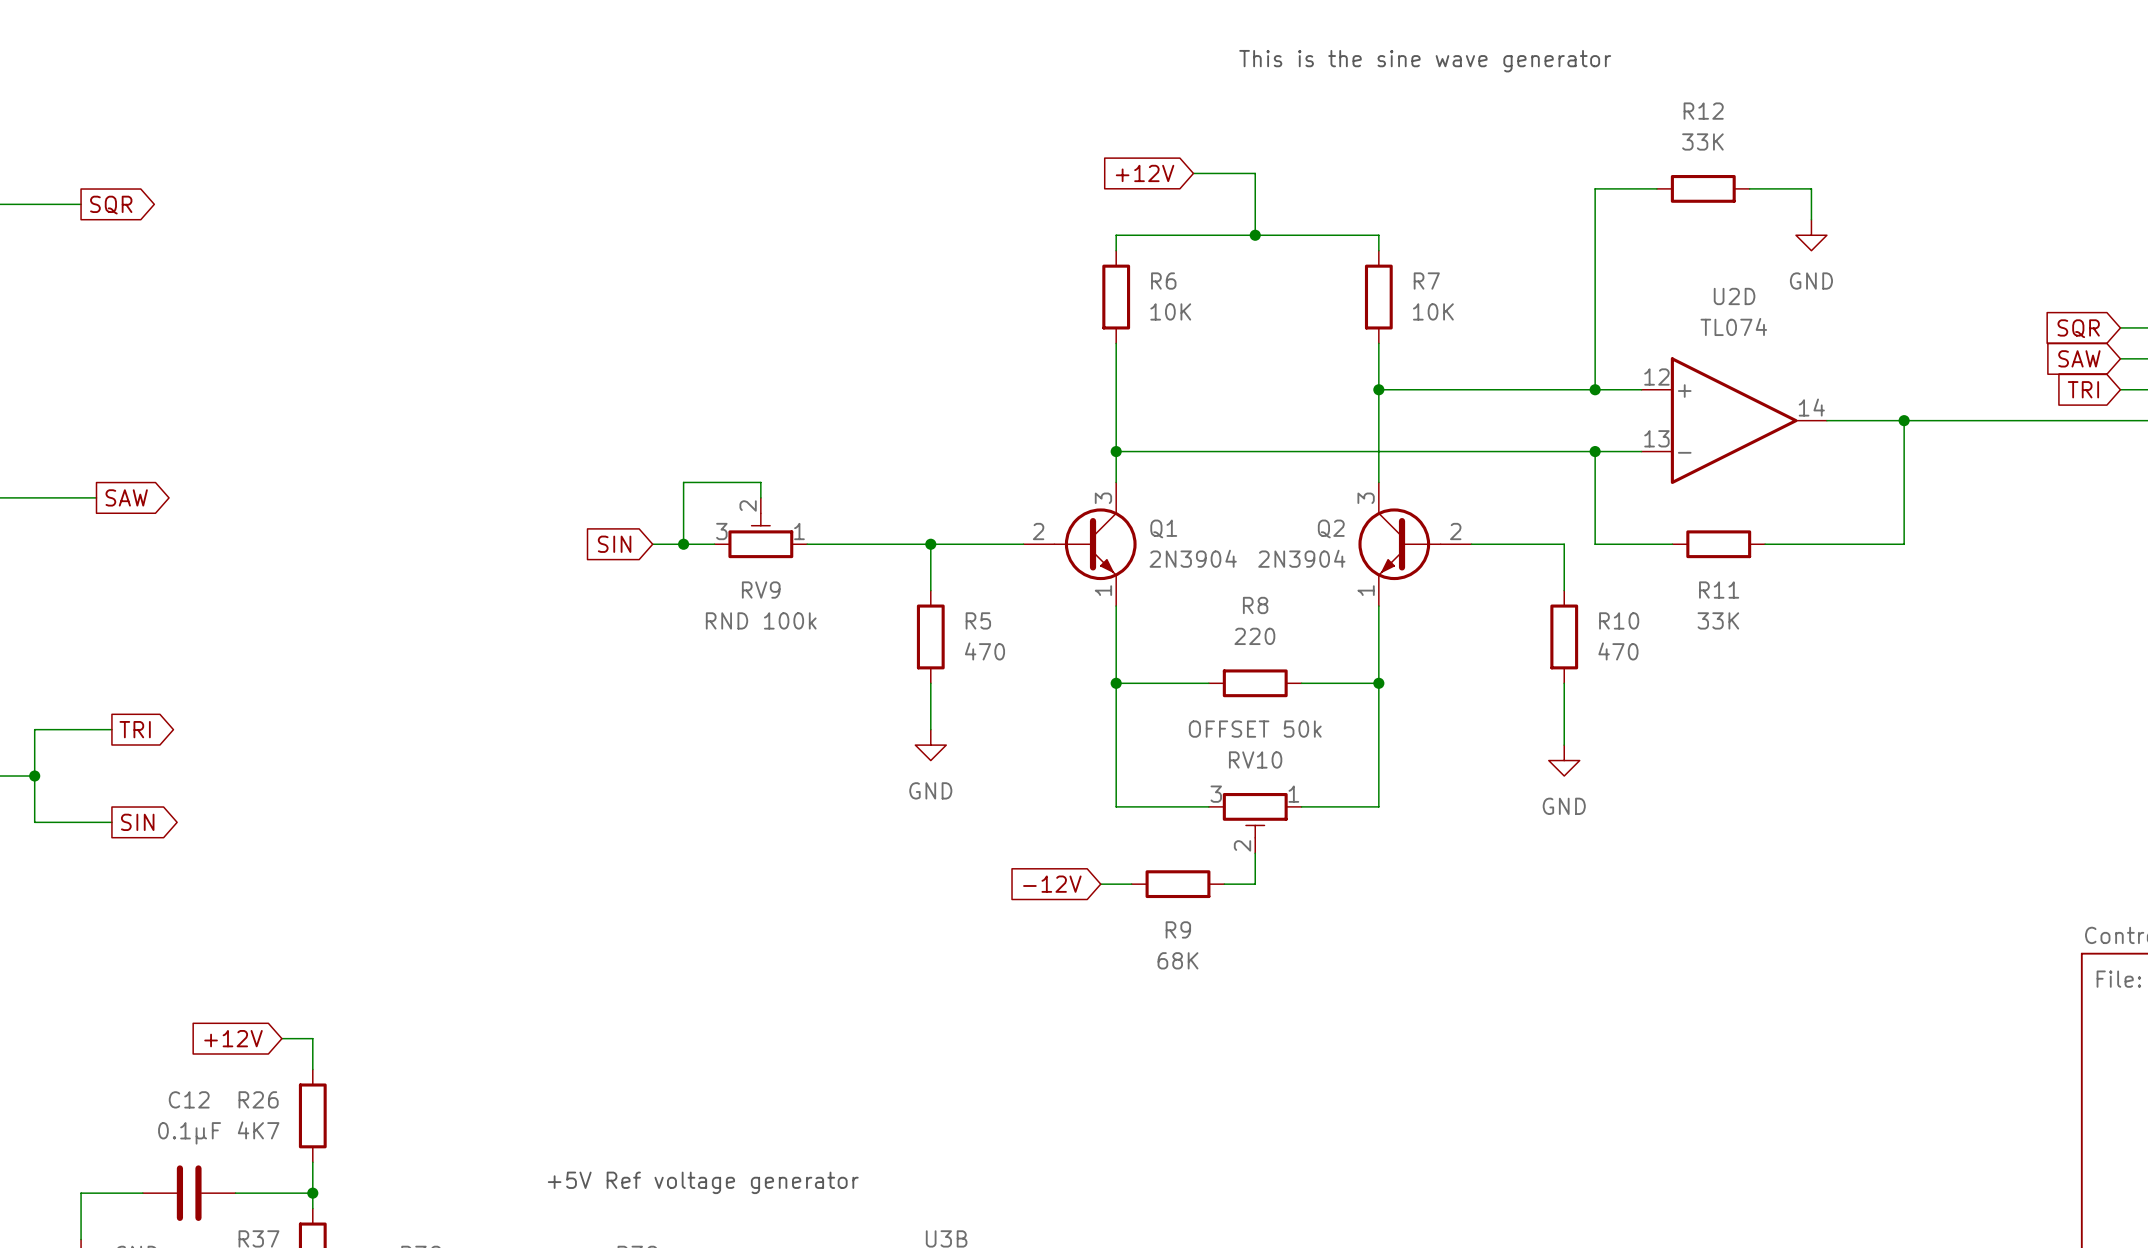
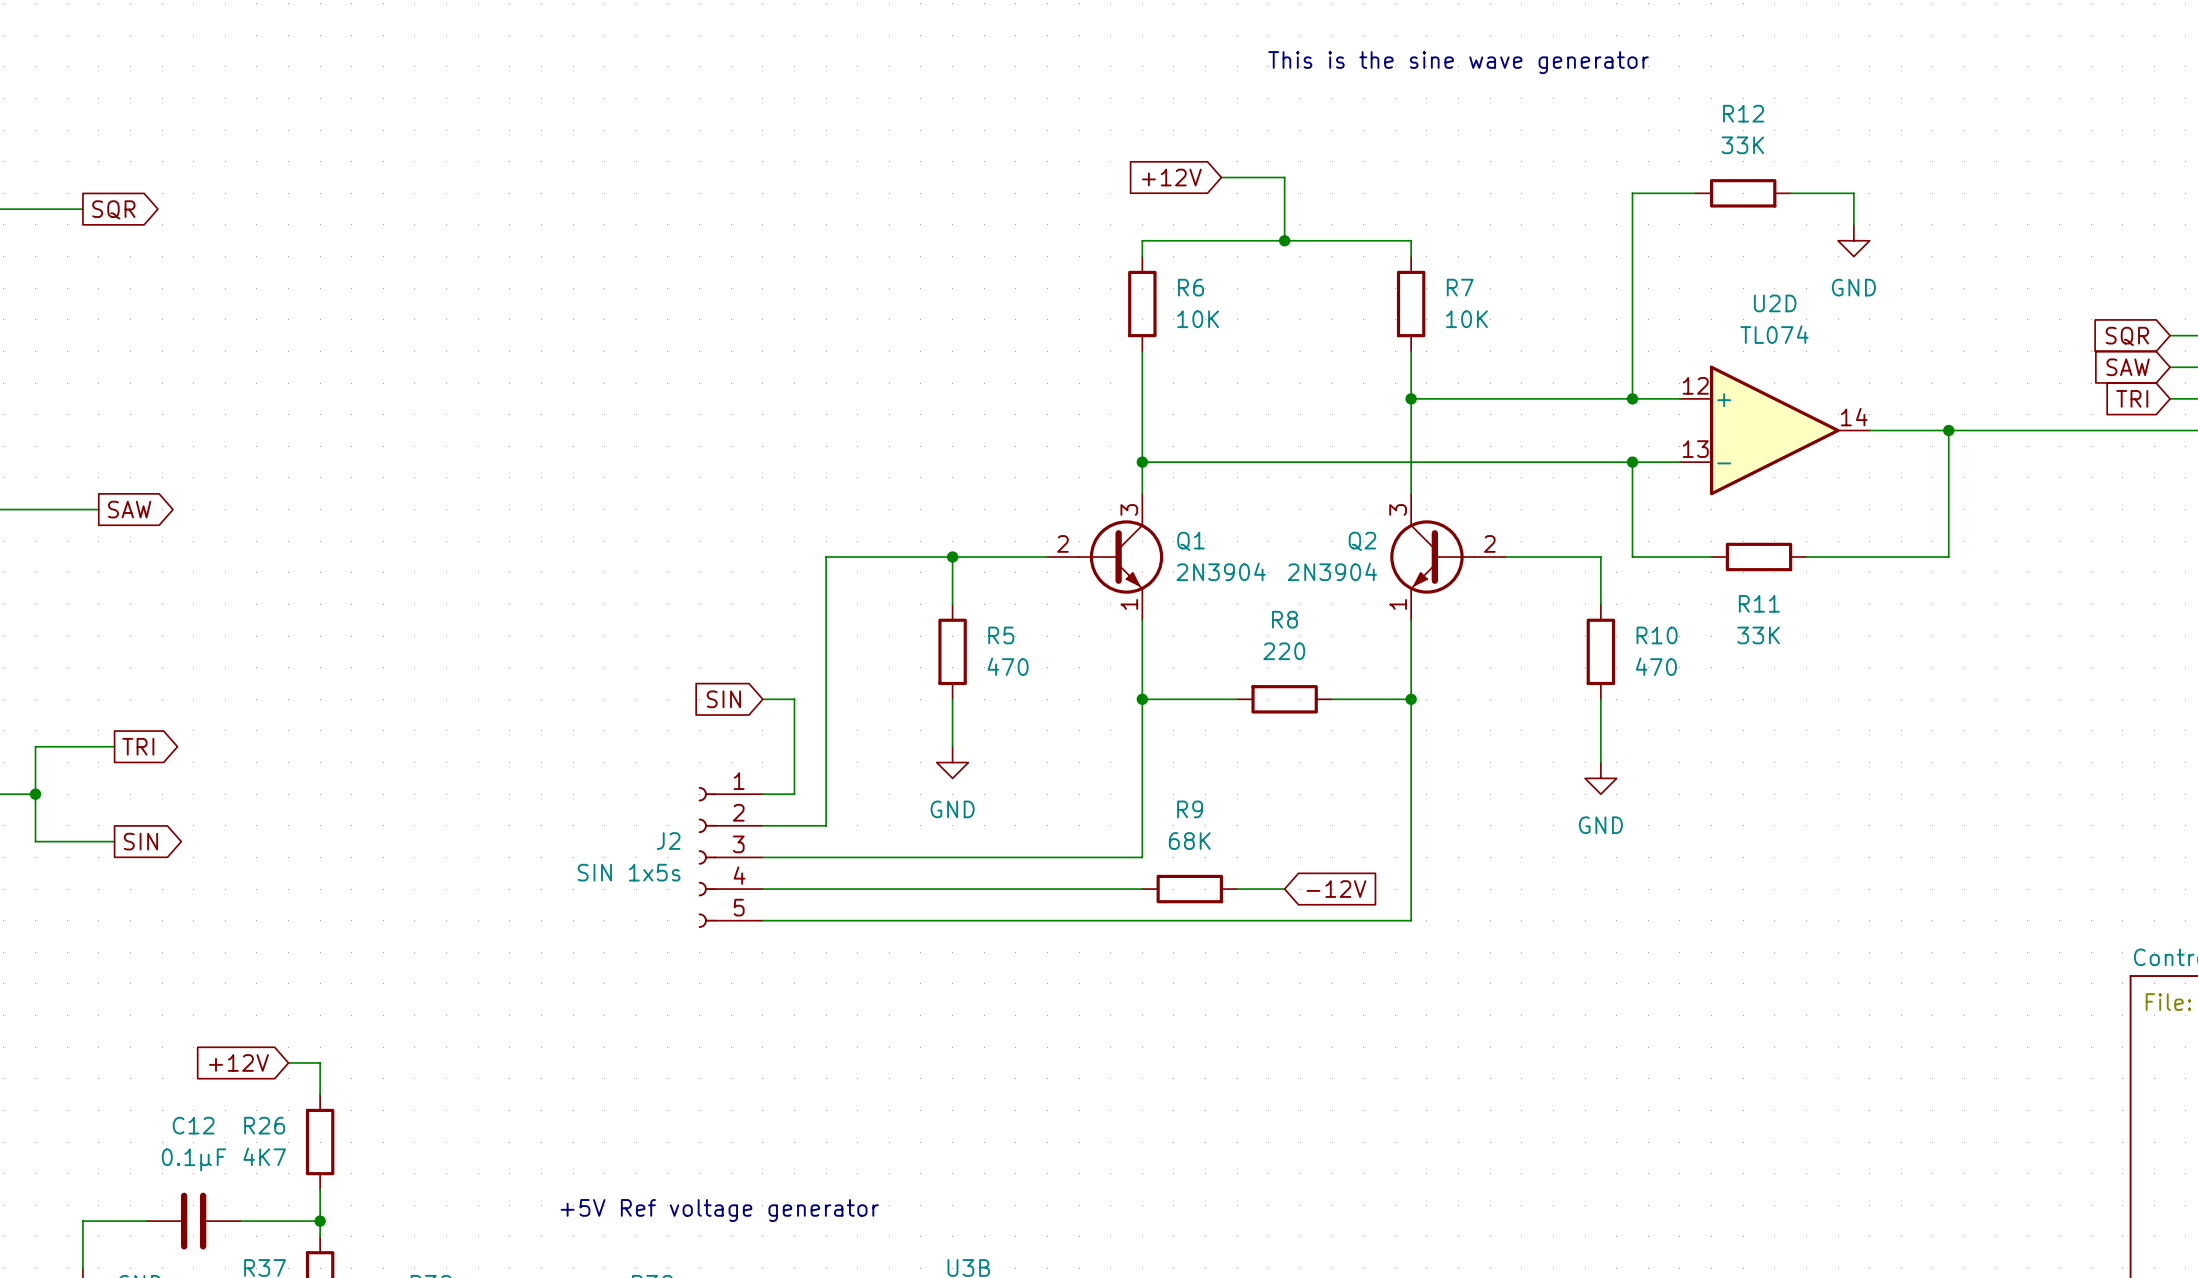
wire: (760, 497) (760, 482) (683, 482) (683, 544) -> none
RV9: RND 100k (760, 528) -> none
global label position: SIN (614, 544) -> SIN (723, 699)
wire: (652, 544) (714, 544) -> none
junction: (683, 544) -> none
wire: none -> (826, 557) (826, 825) (762, 825)
wire: none -> (762, 699) (794, 699) (794, 794) (762, 794)
wire: (1116, 806) (1208, 806) -> (1142, 825) (1142, 857) (762, 857)
wire: (1301, 806) (1378, 806) -> (762, 920) (1411, 920) (1411, 825)
RV10: OFFSET 50k (1255, 823) -> none
J2: none -> SIN 1x5s (730, 857)
wire: (1255, 853) (1255, 884) (1224, 884) -> none
wire: none -> (762, 889) (1142, 889)
wire: none -> (1237, 889) (1284, 889)
global label rotation: 0° (1052, 884) -> 180° (1336, 889)
global label position: -12V (1052, 884) -> -12V (1336, 889)
wire: (1100, 884) (1131, 884) -> none
R9 position: (1177, 884) -> (1189, 889)
R9 name position: R9 (1178, 929) -> R9 (1190, 809)
R9 value position: 68K (1177, 960) -> 68K (1189, 841)

